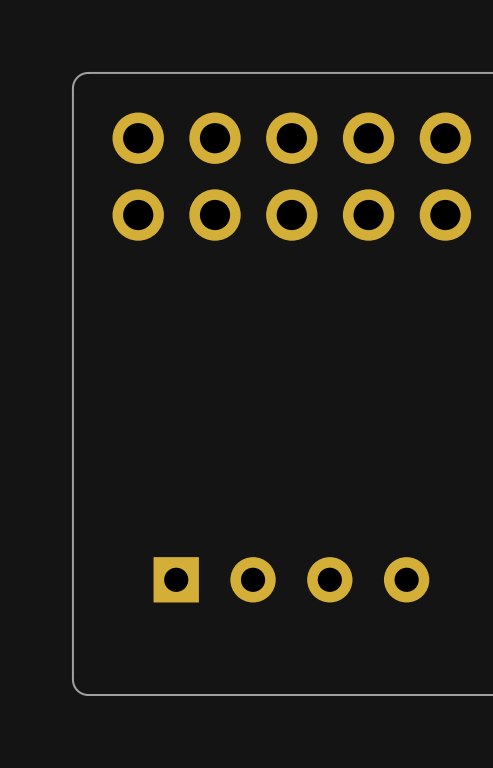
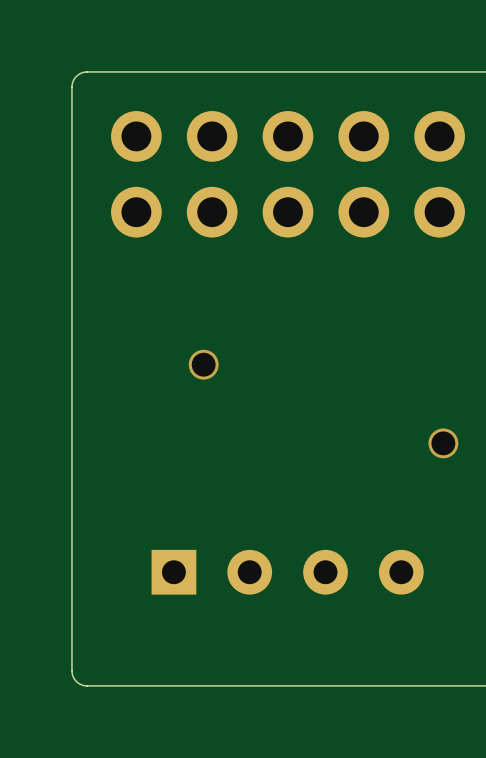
via: none -> (203, 364)
via: none -> (443, 443)

